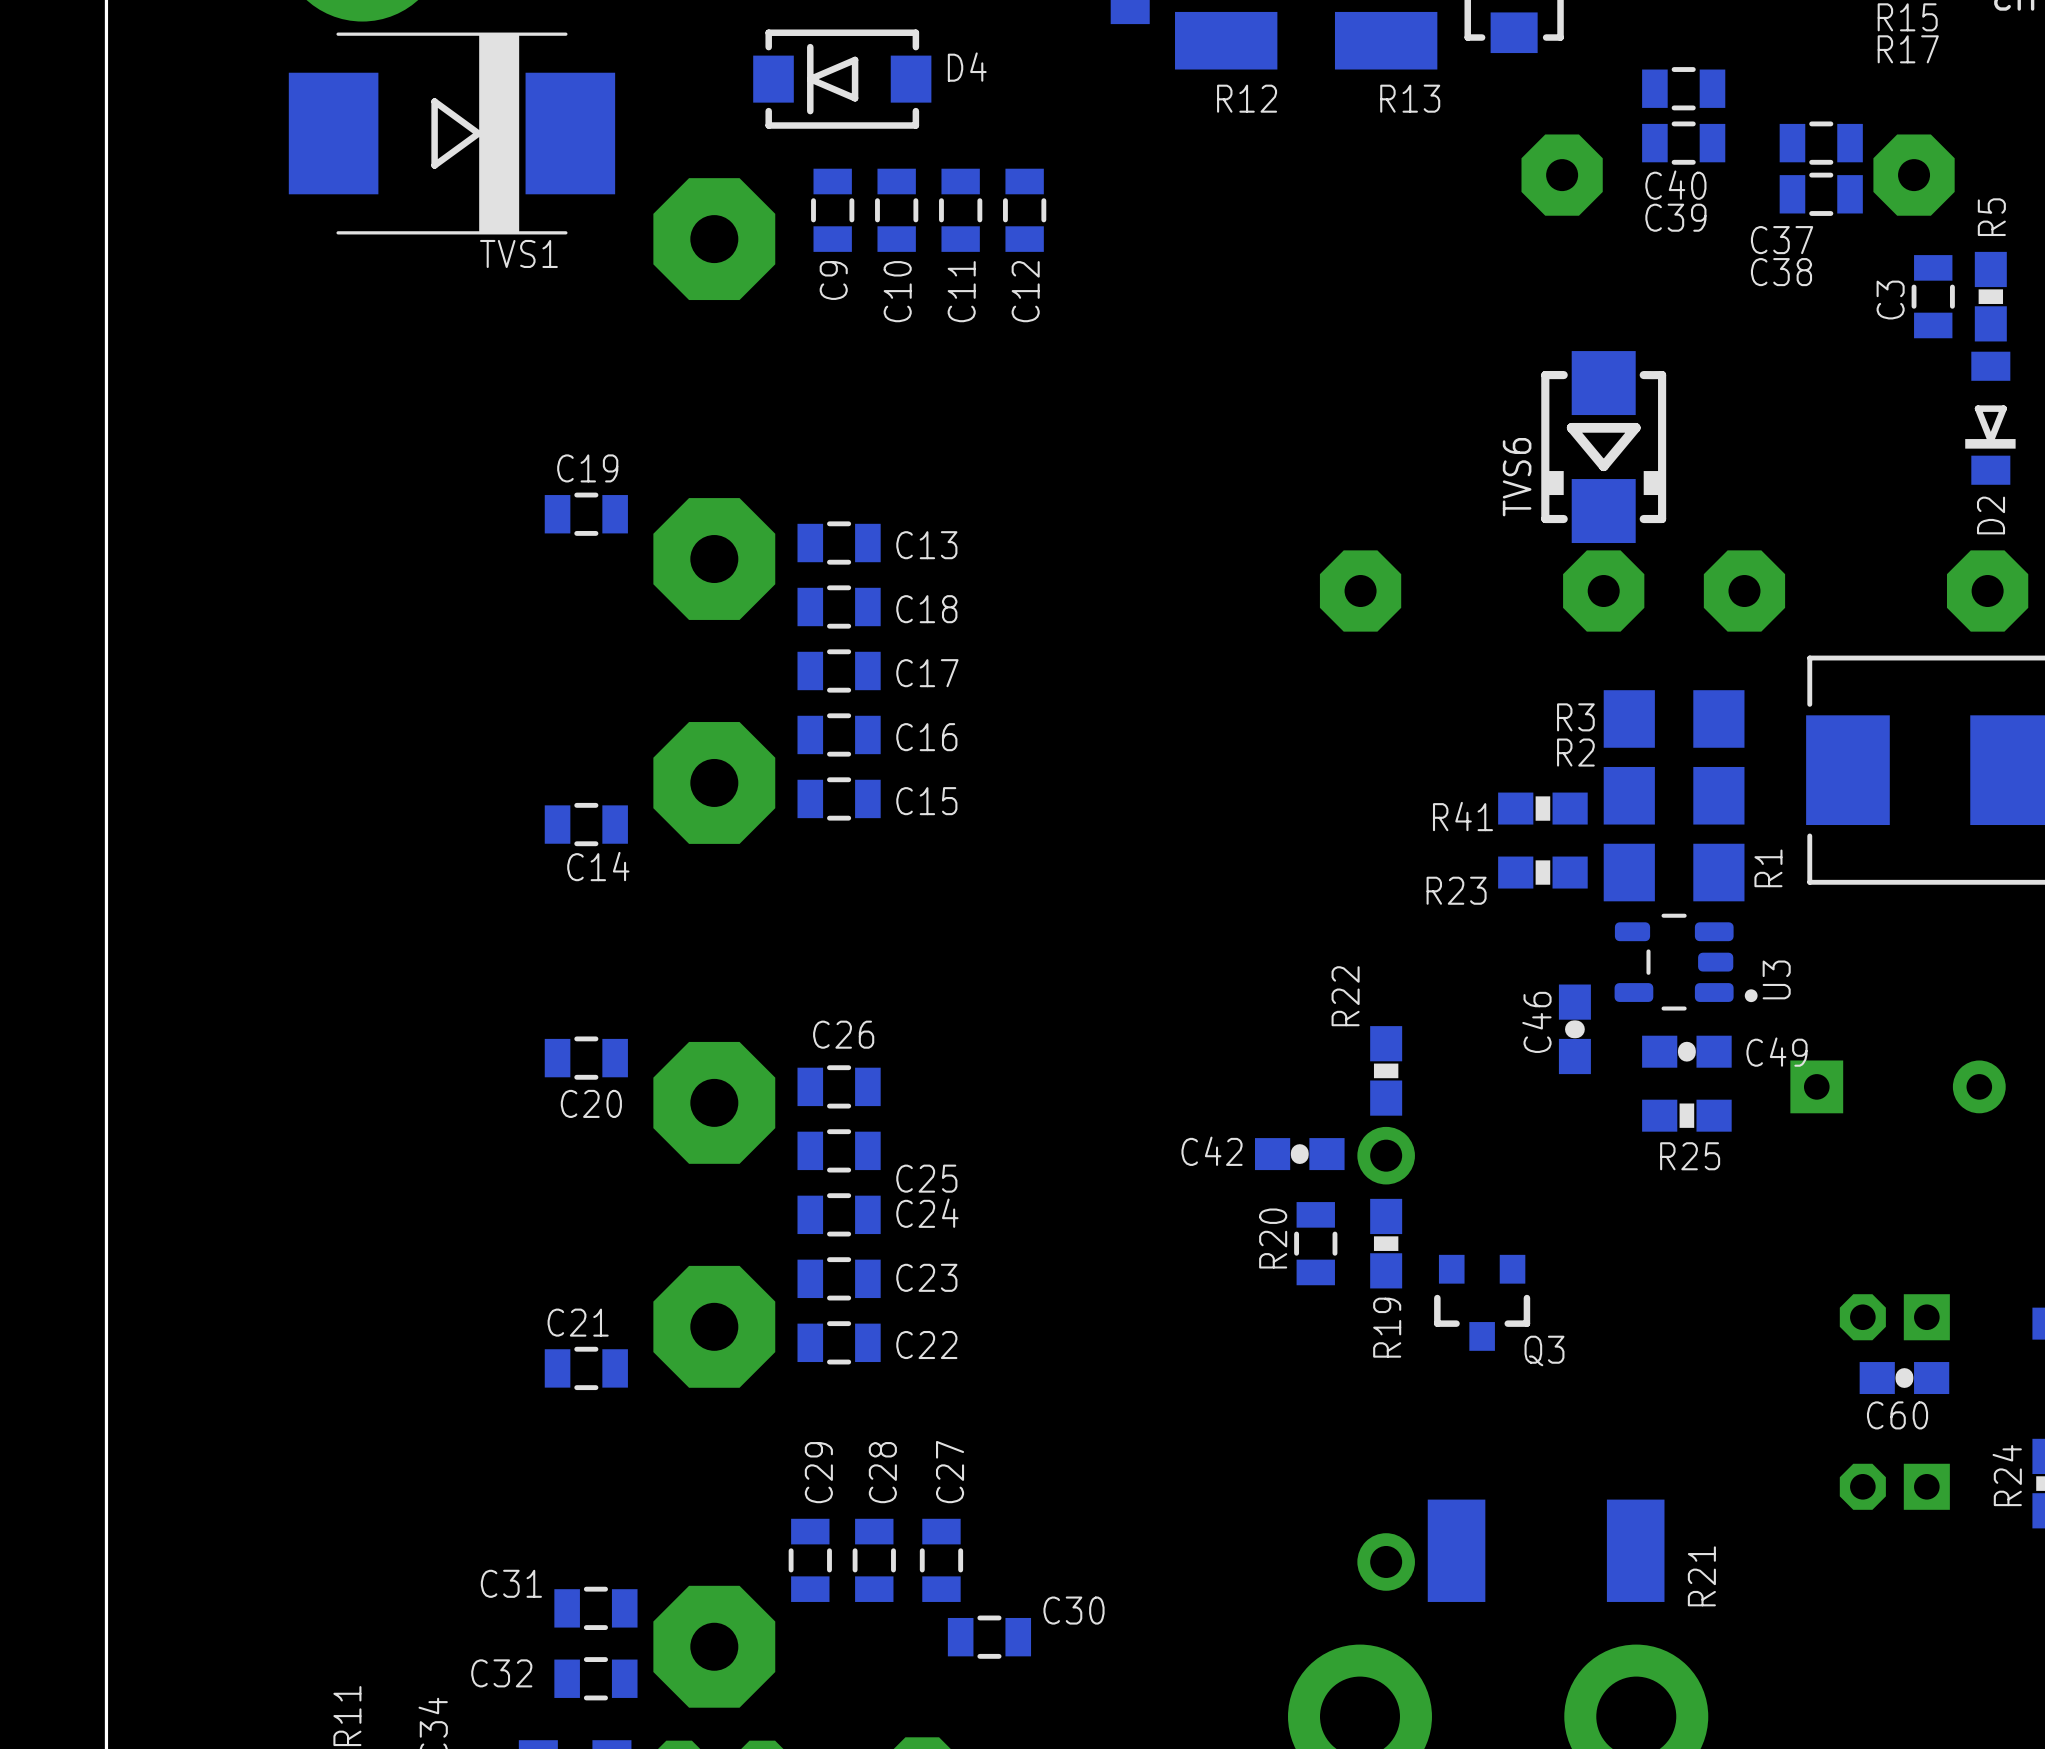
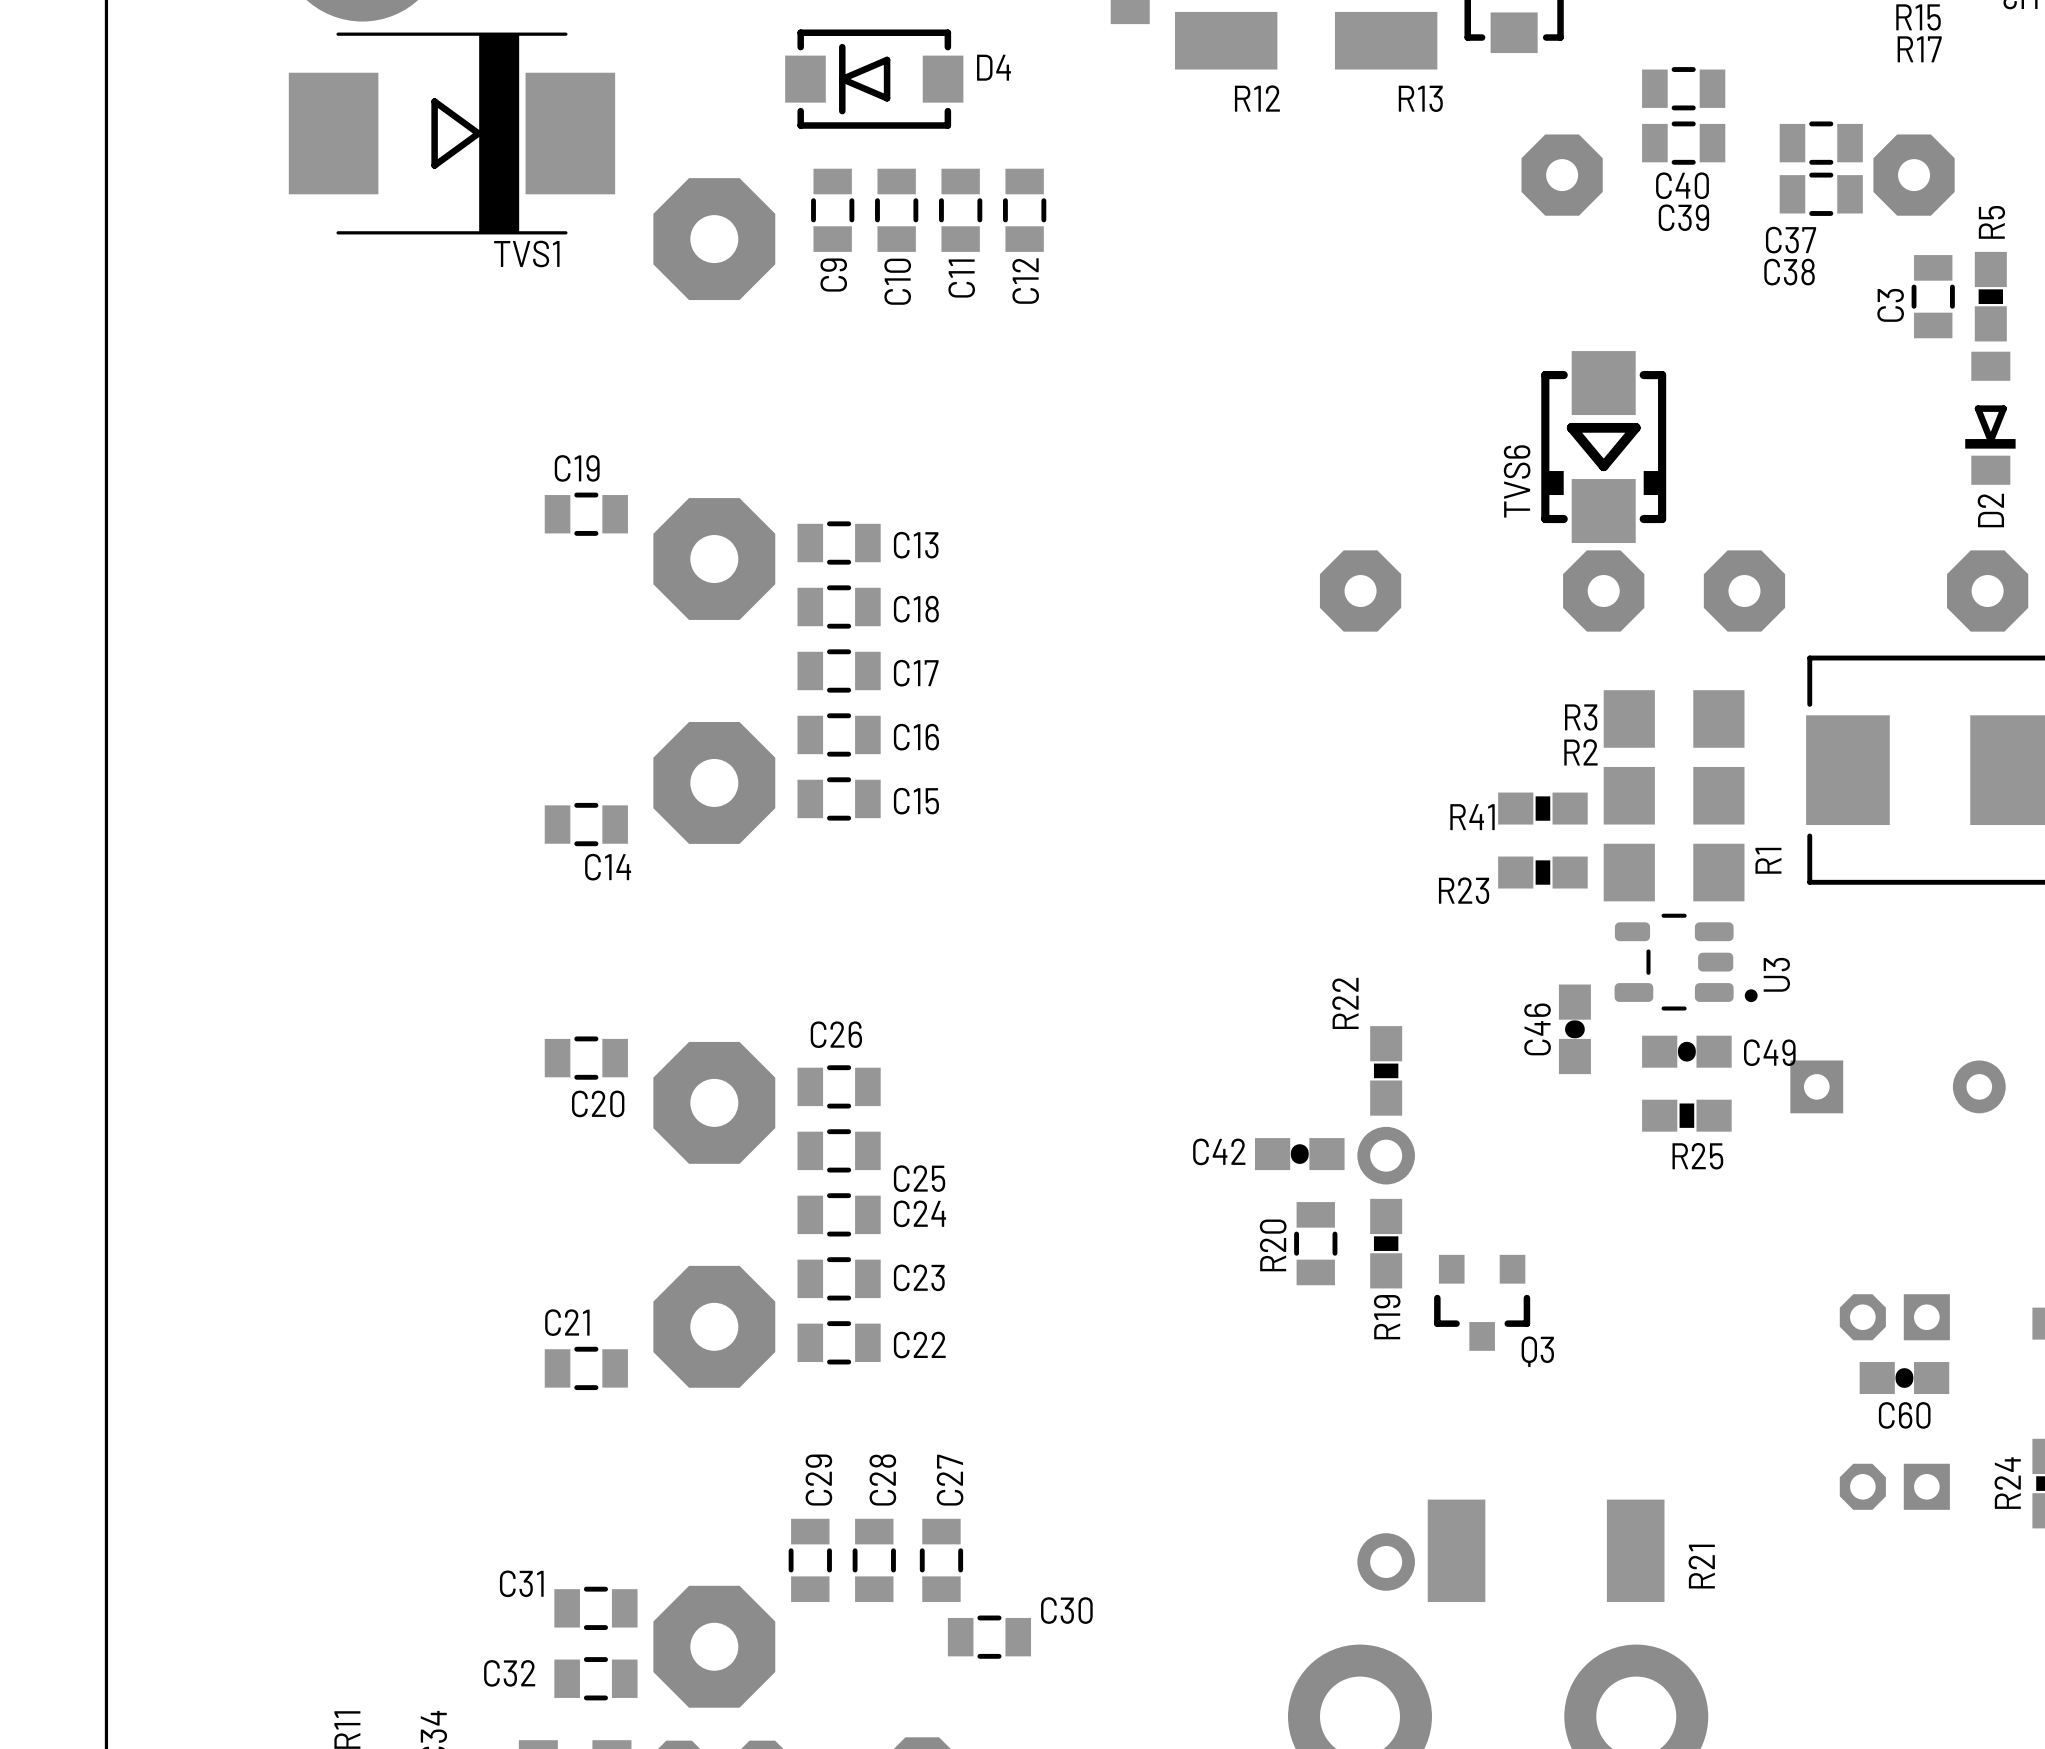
D4 position: (842, 79) -> (874, 79)

